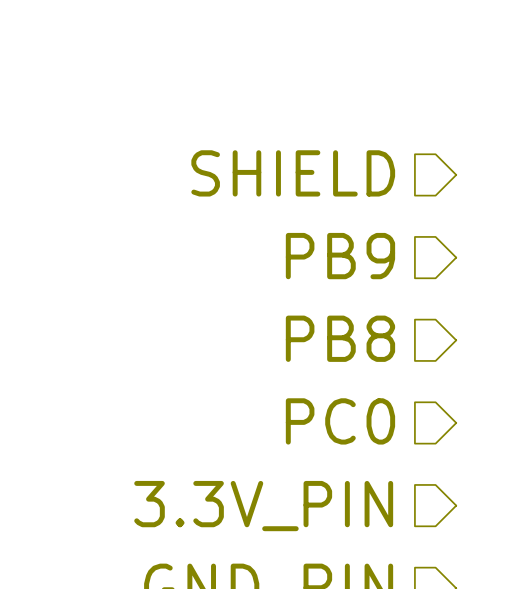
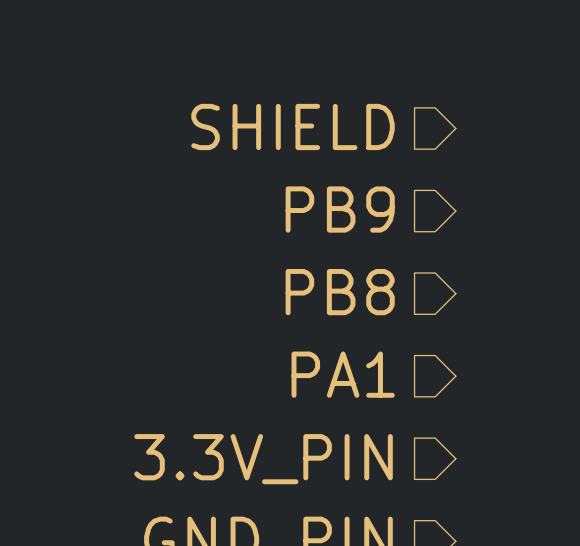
hierarchical label: PC0 (340, 421) -> PA1 (343, 374)

